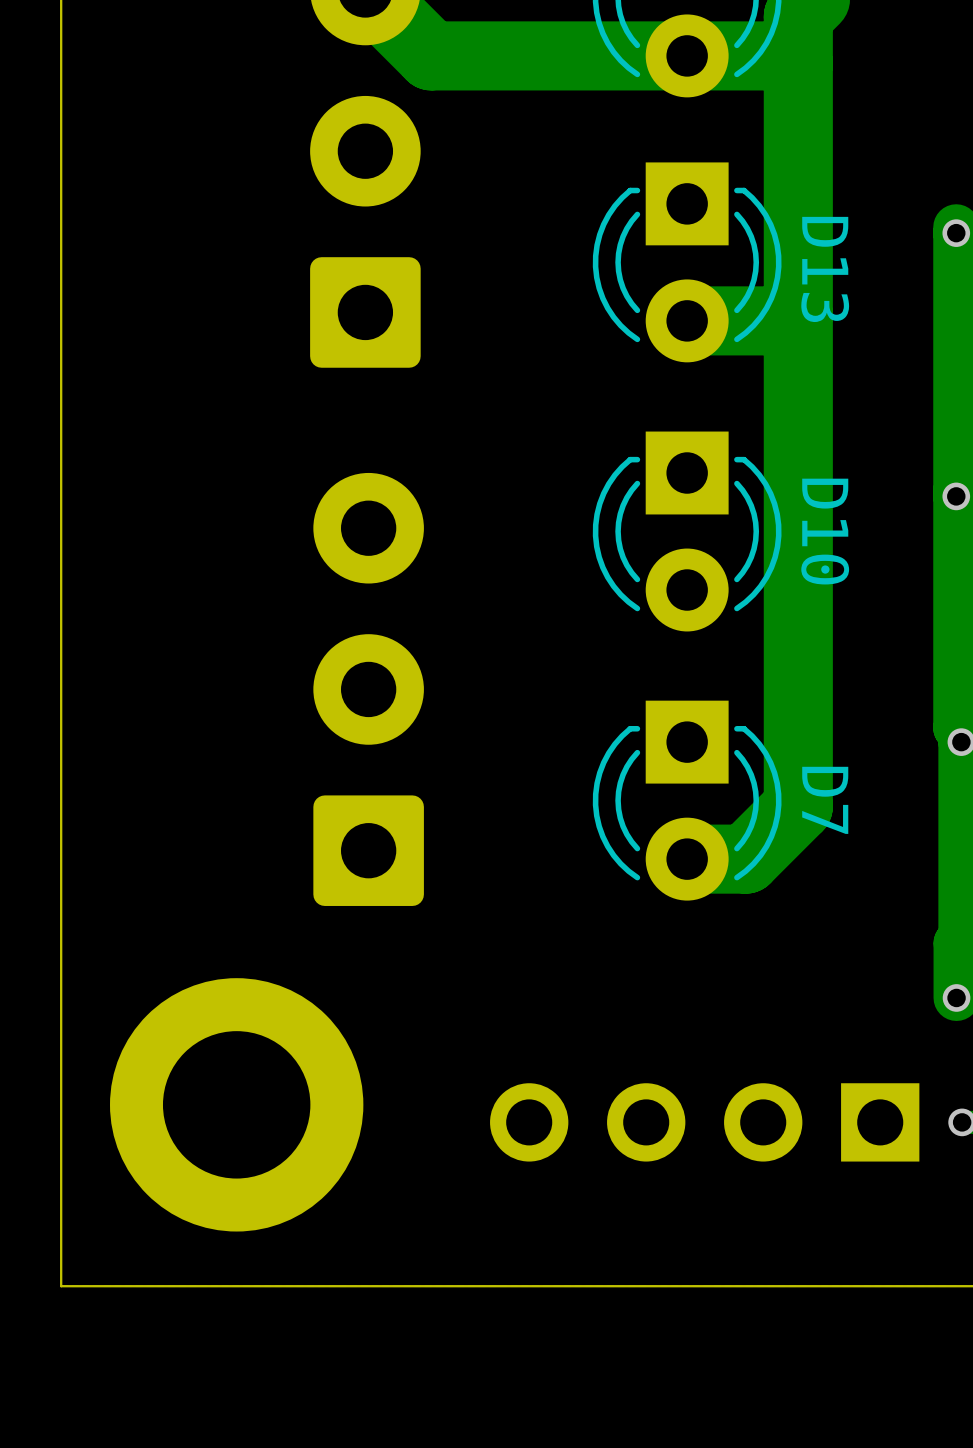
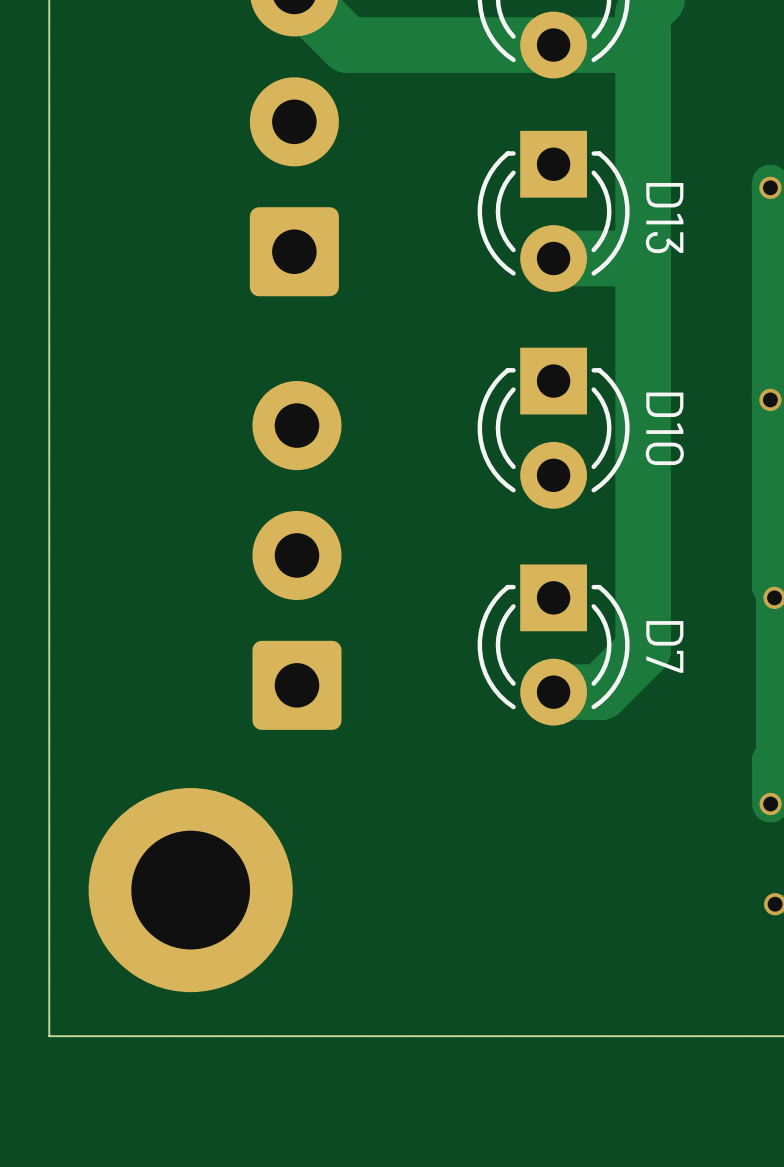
part: (704, 1122) -> none

